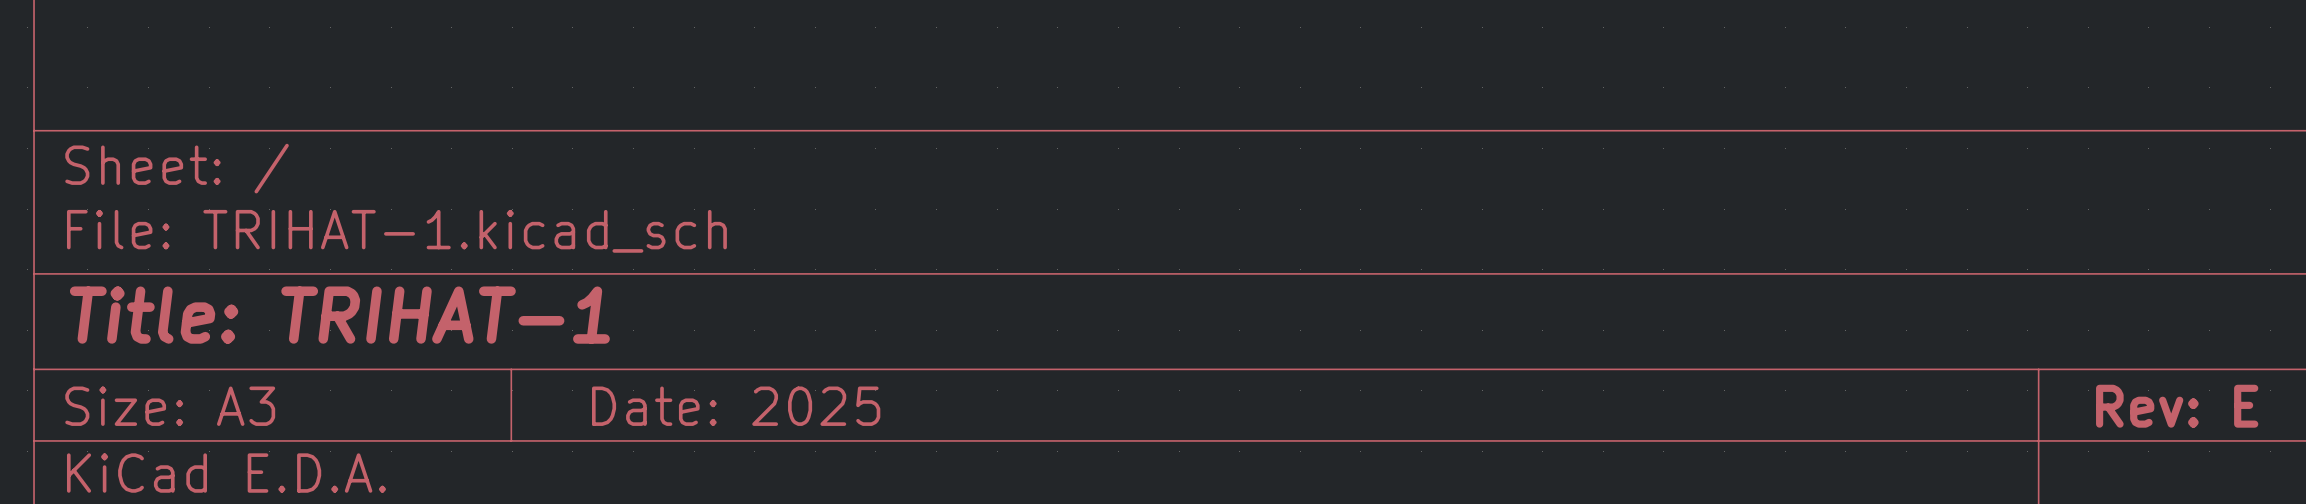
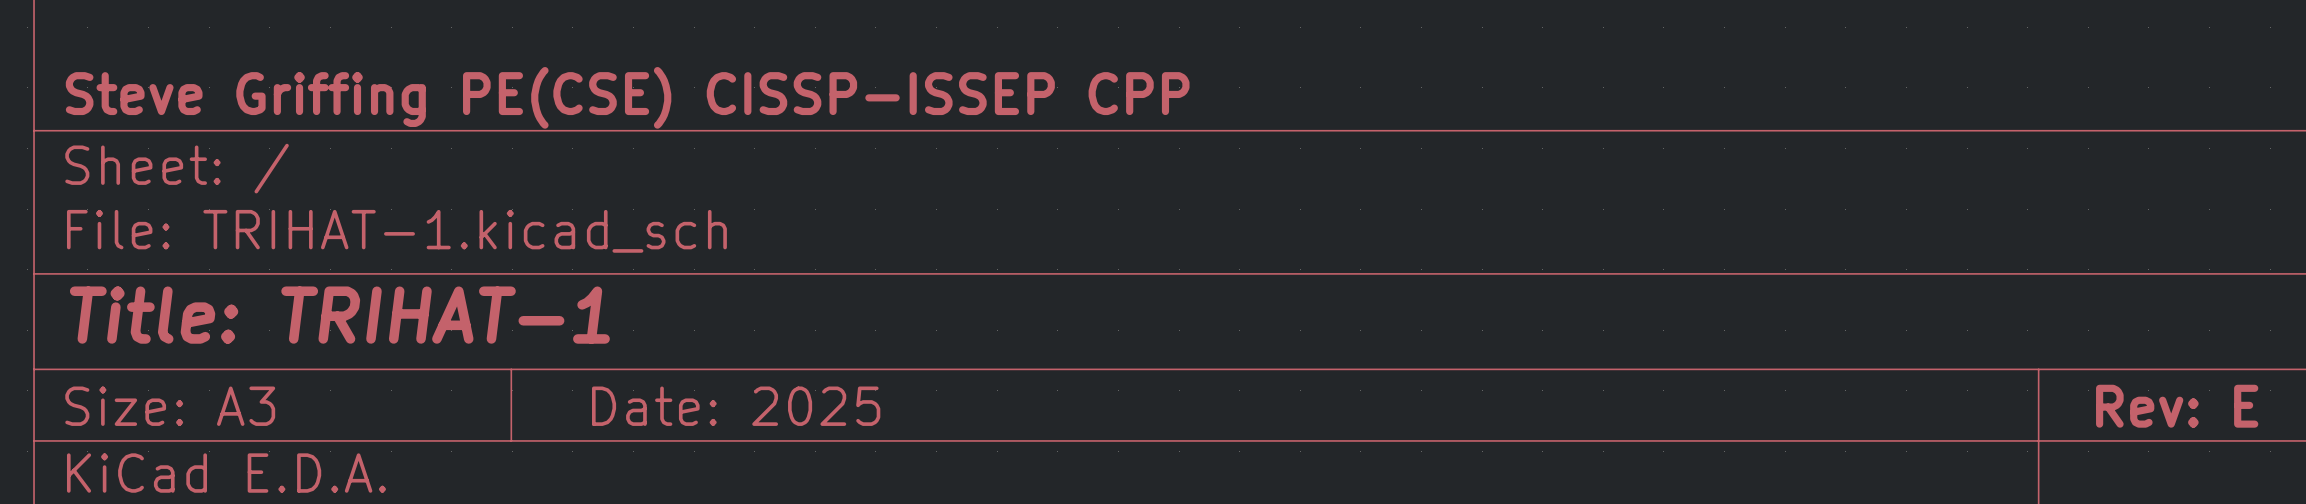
title block: none -> Steve Griffing PE(CSE) CISSP-ISSEP CPP (627, 97)

